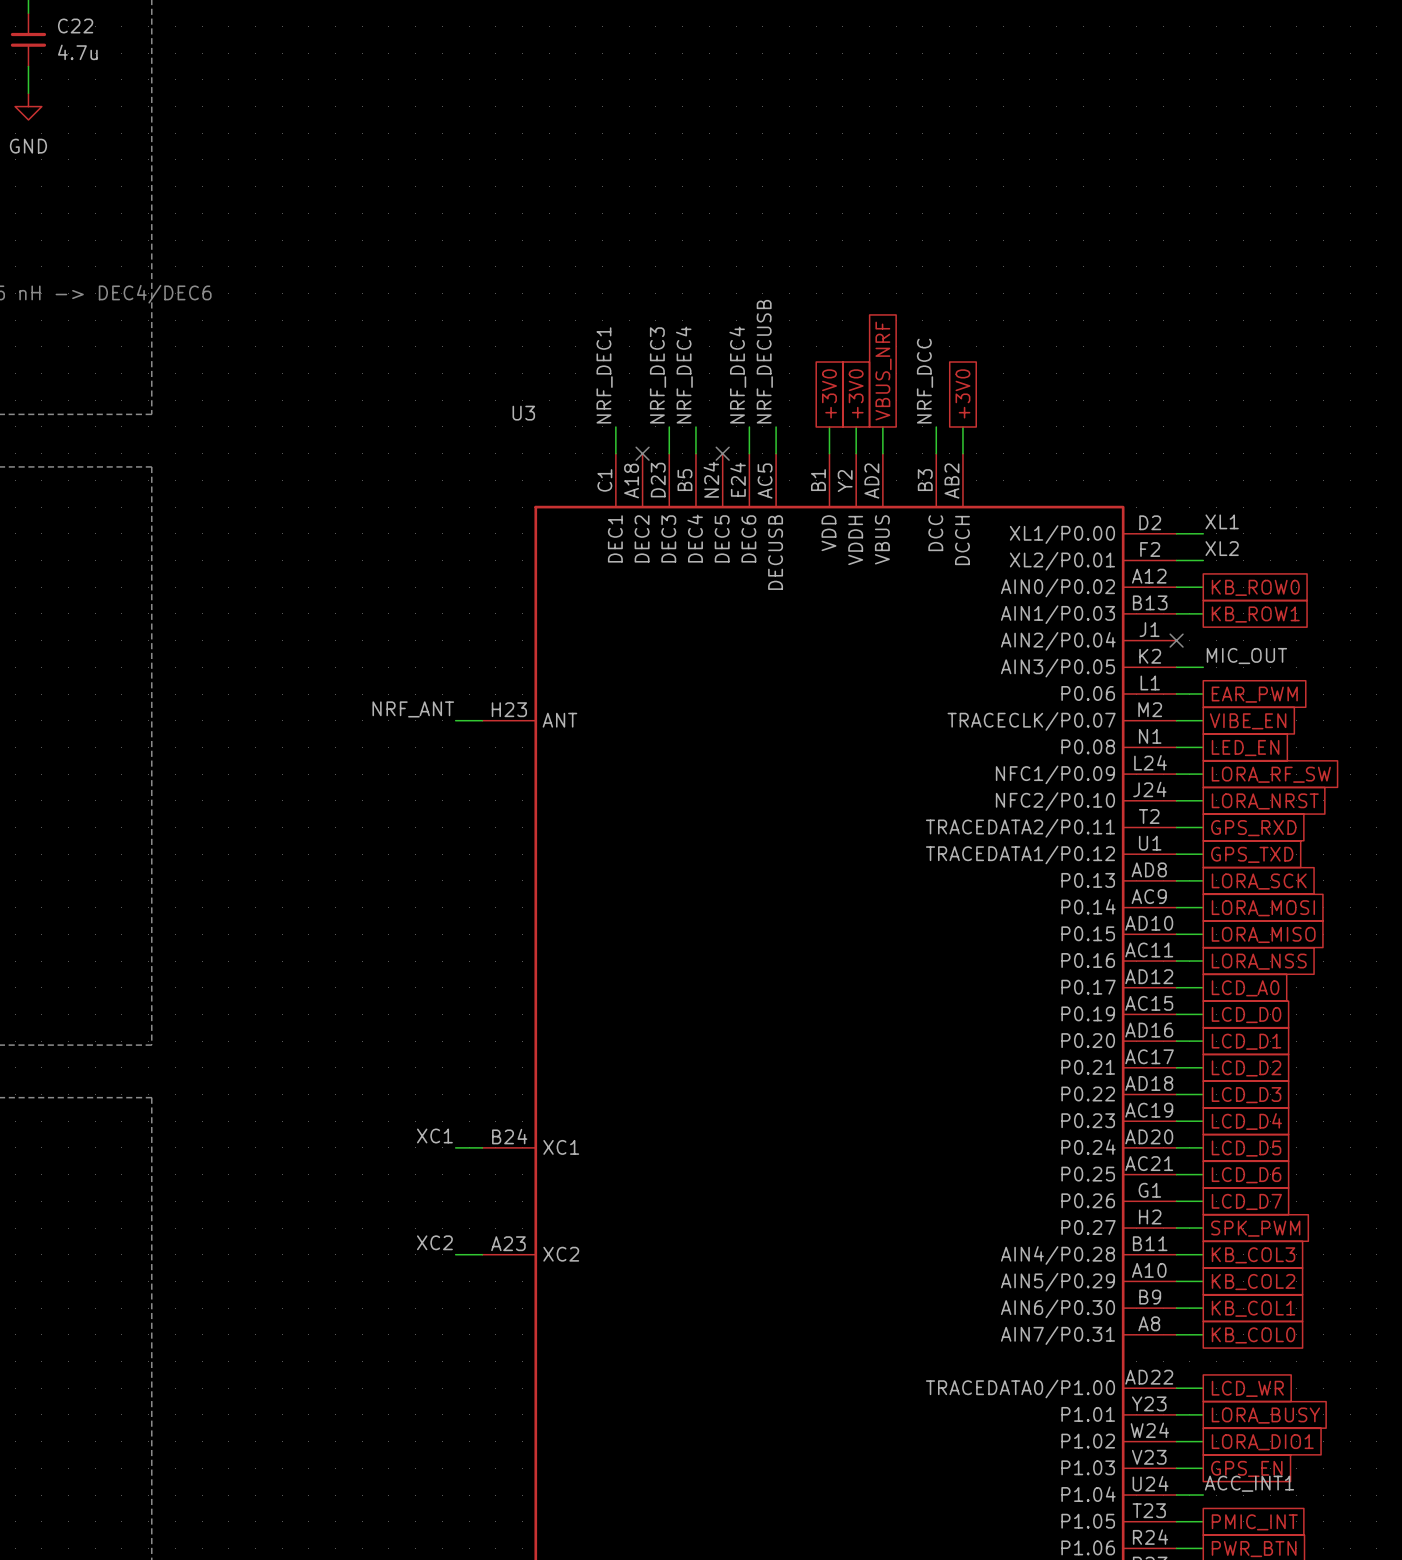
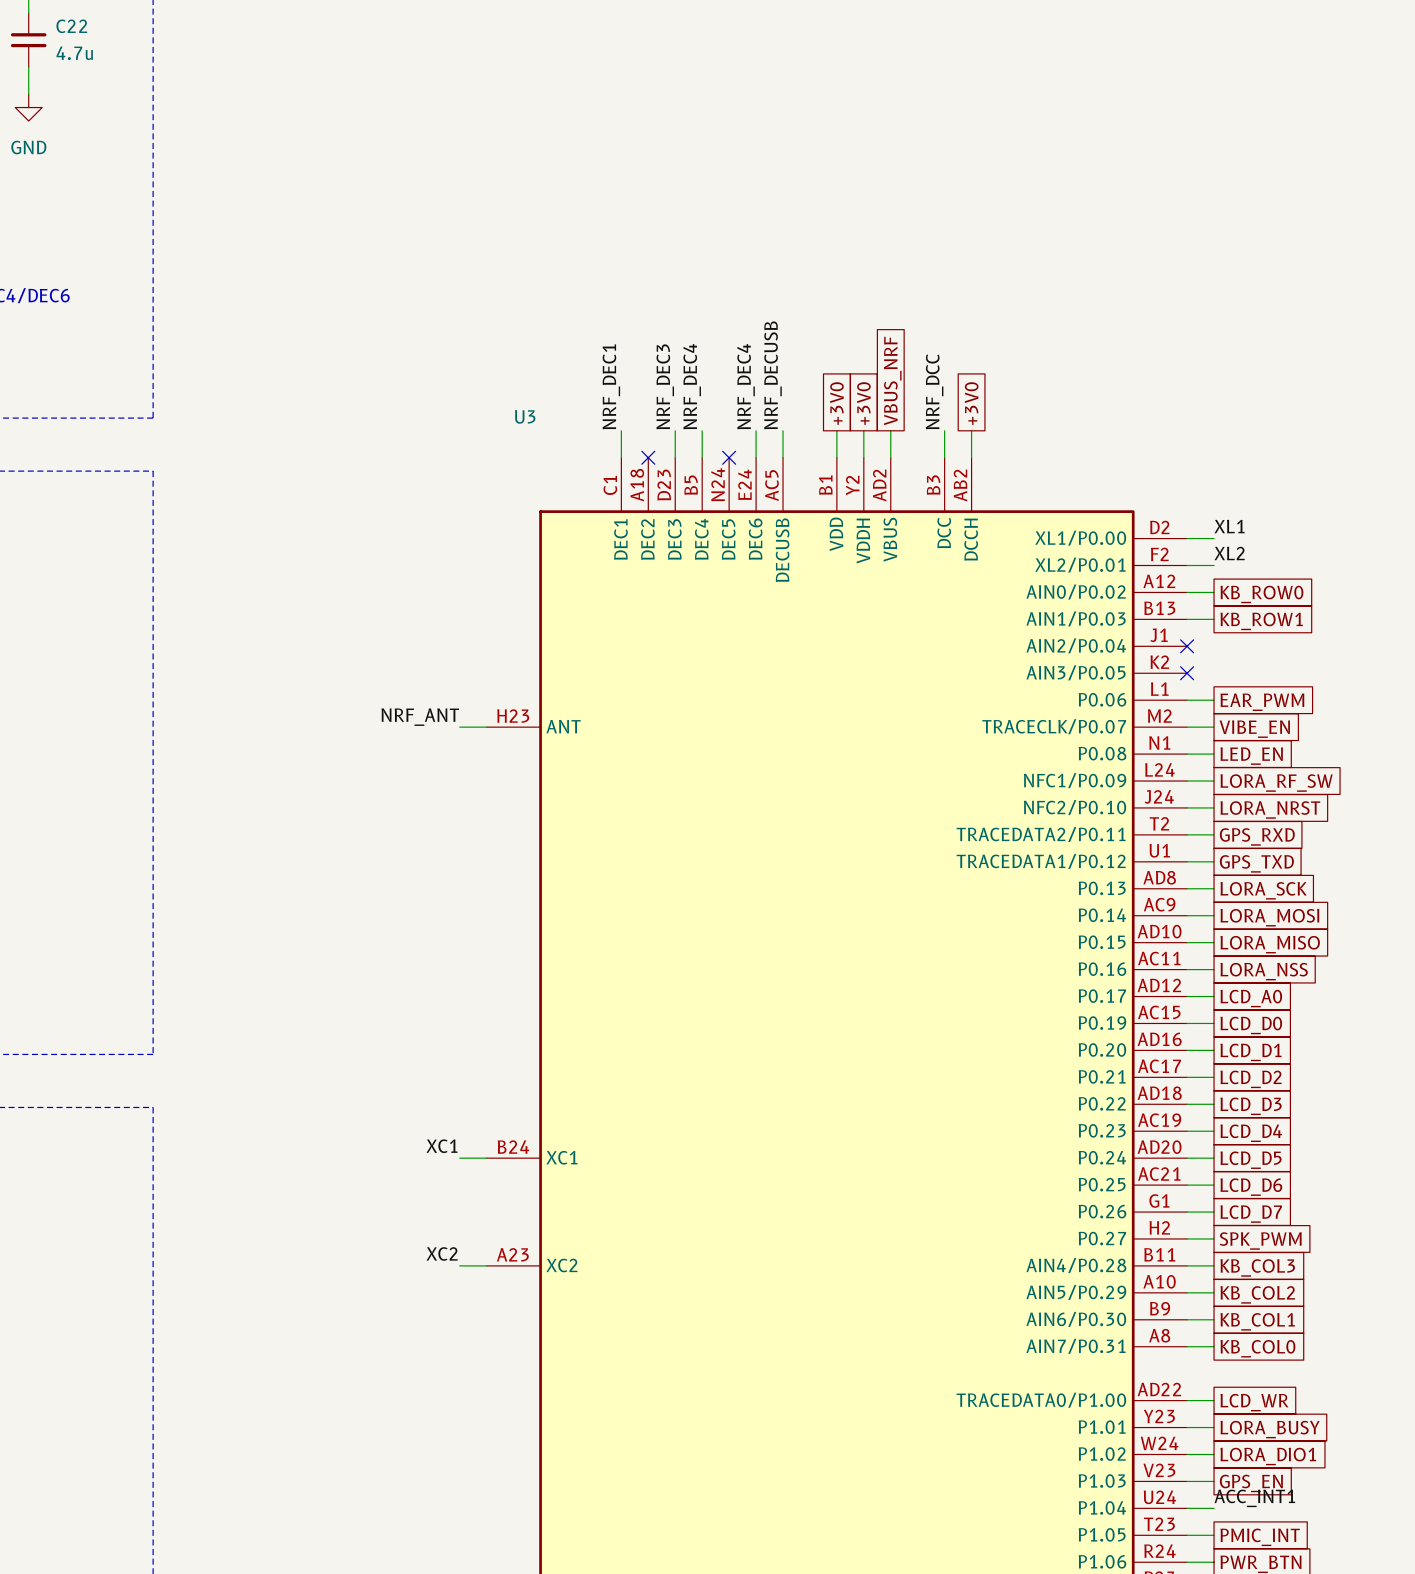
label: MIC_OUT (1246, 656) -> none
wire: (1176, 667) (1203, 667) -> none
no-connect mark: none -> (1187, 673)

